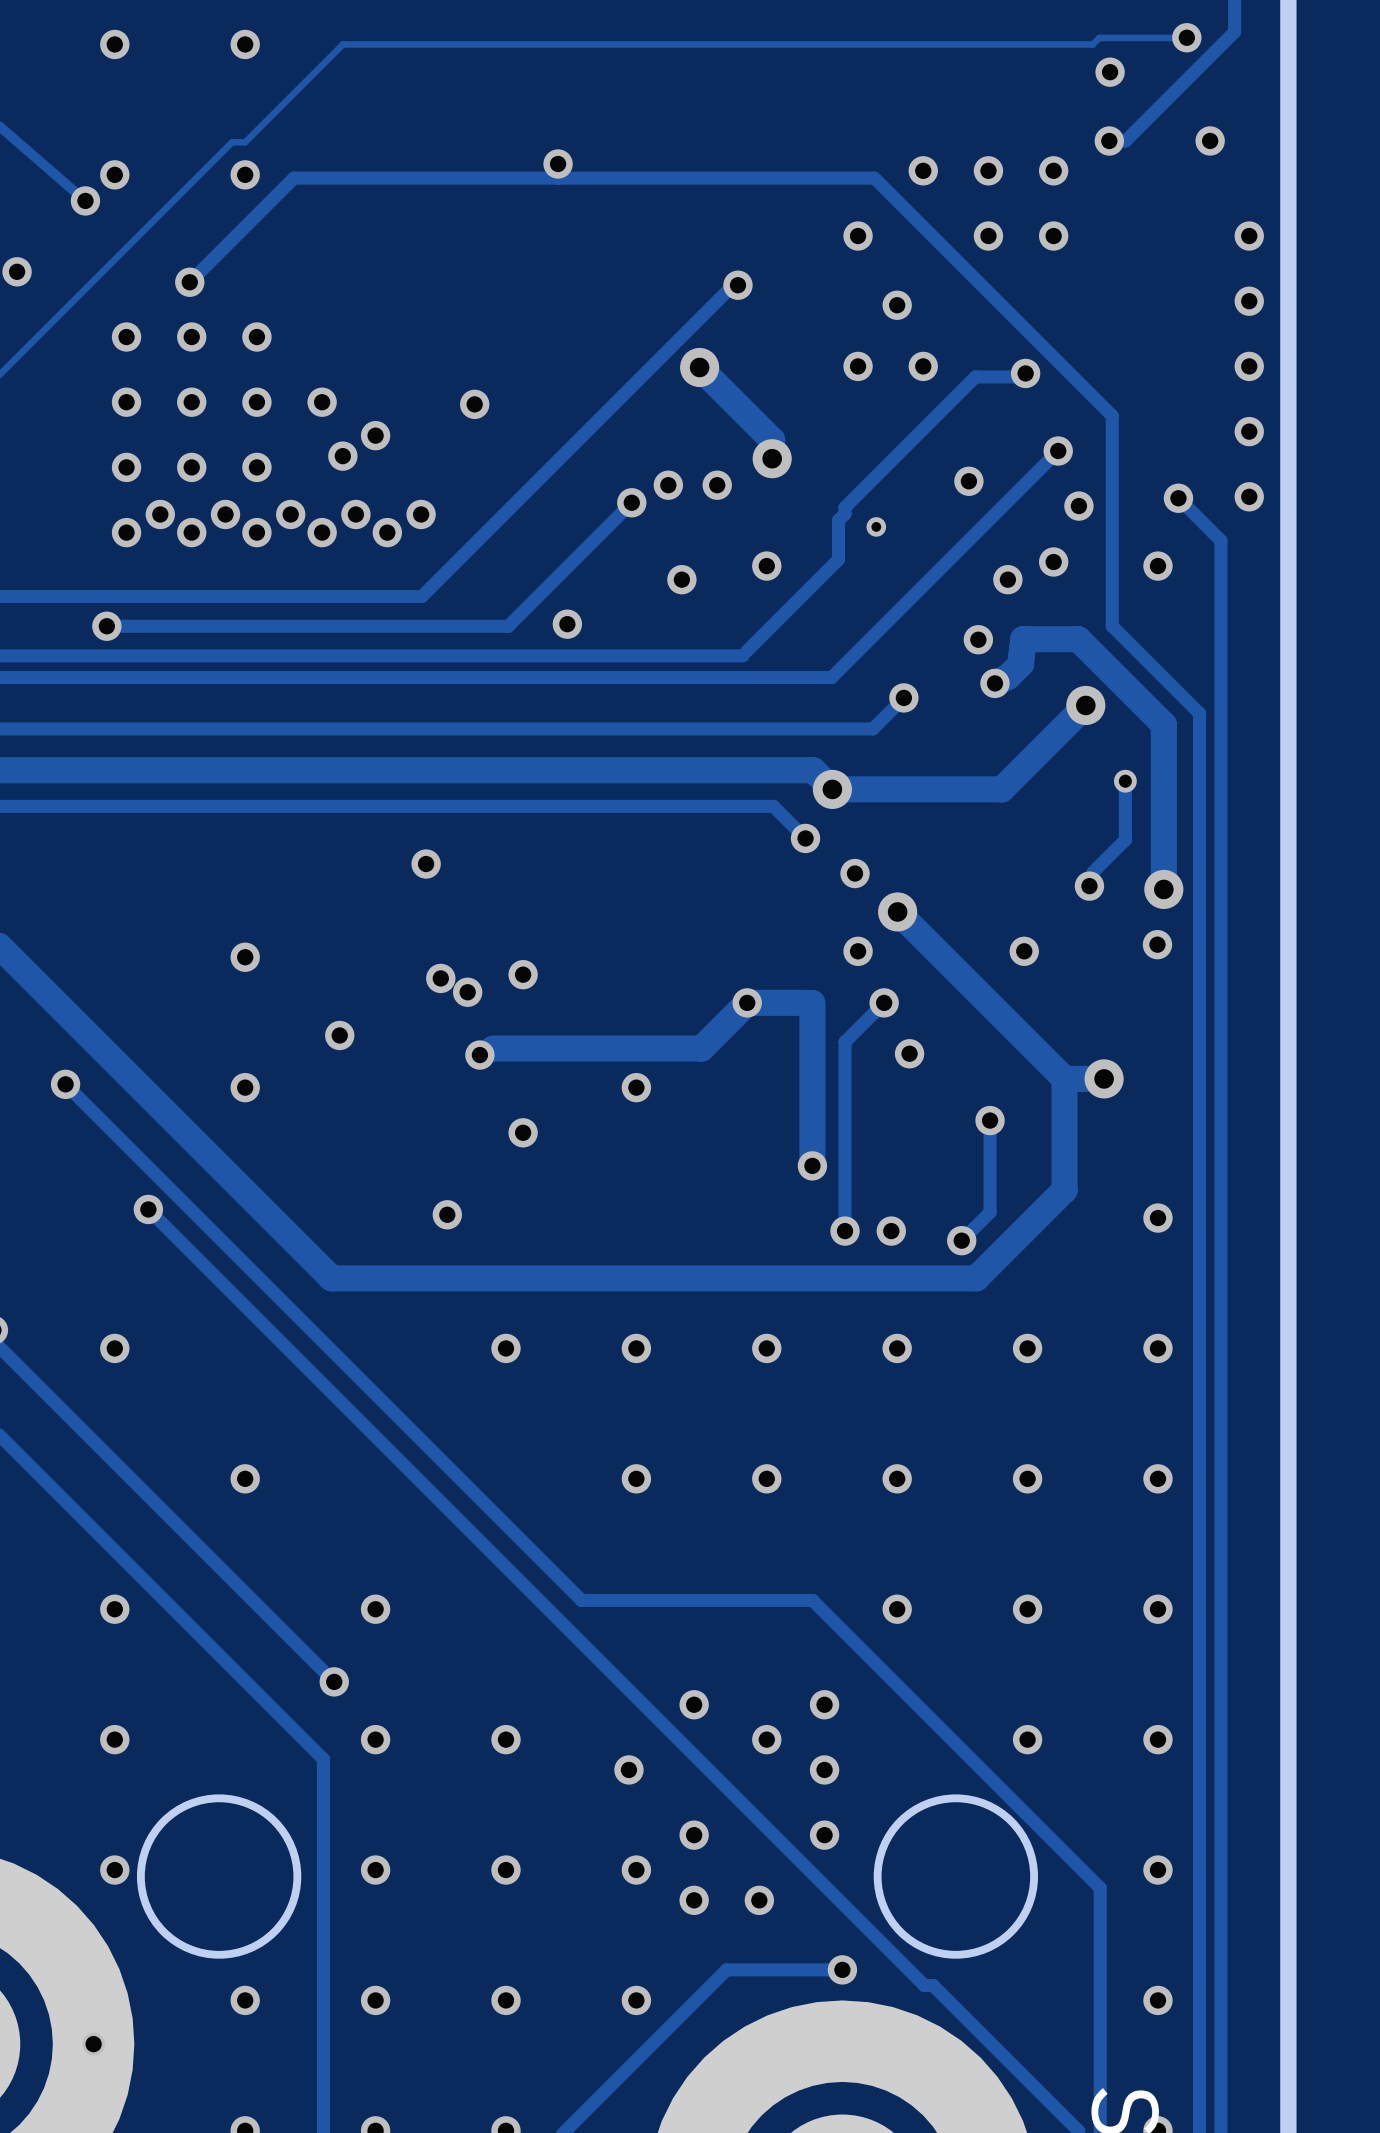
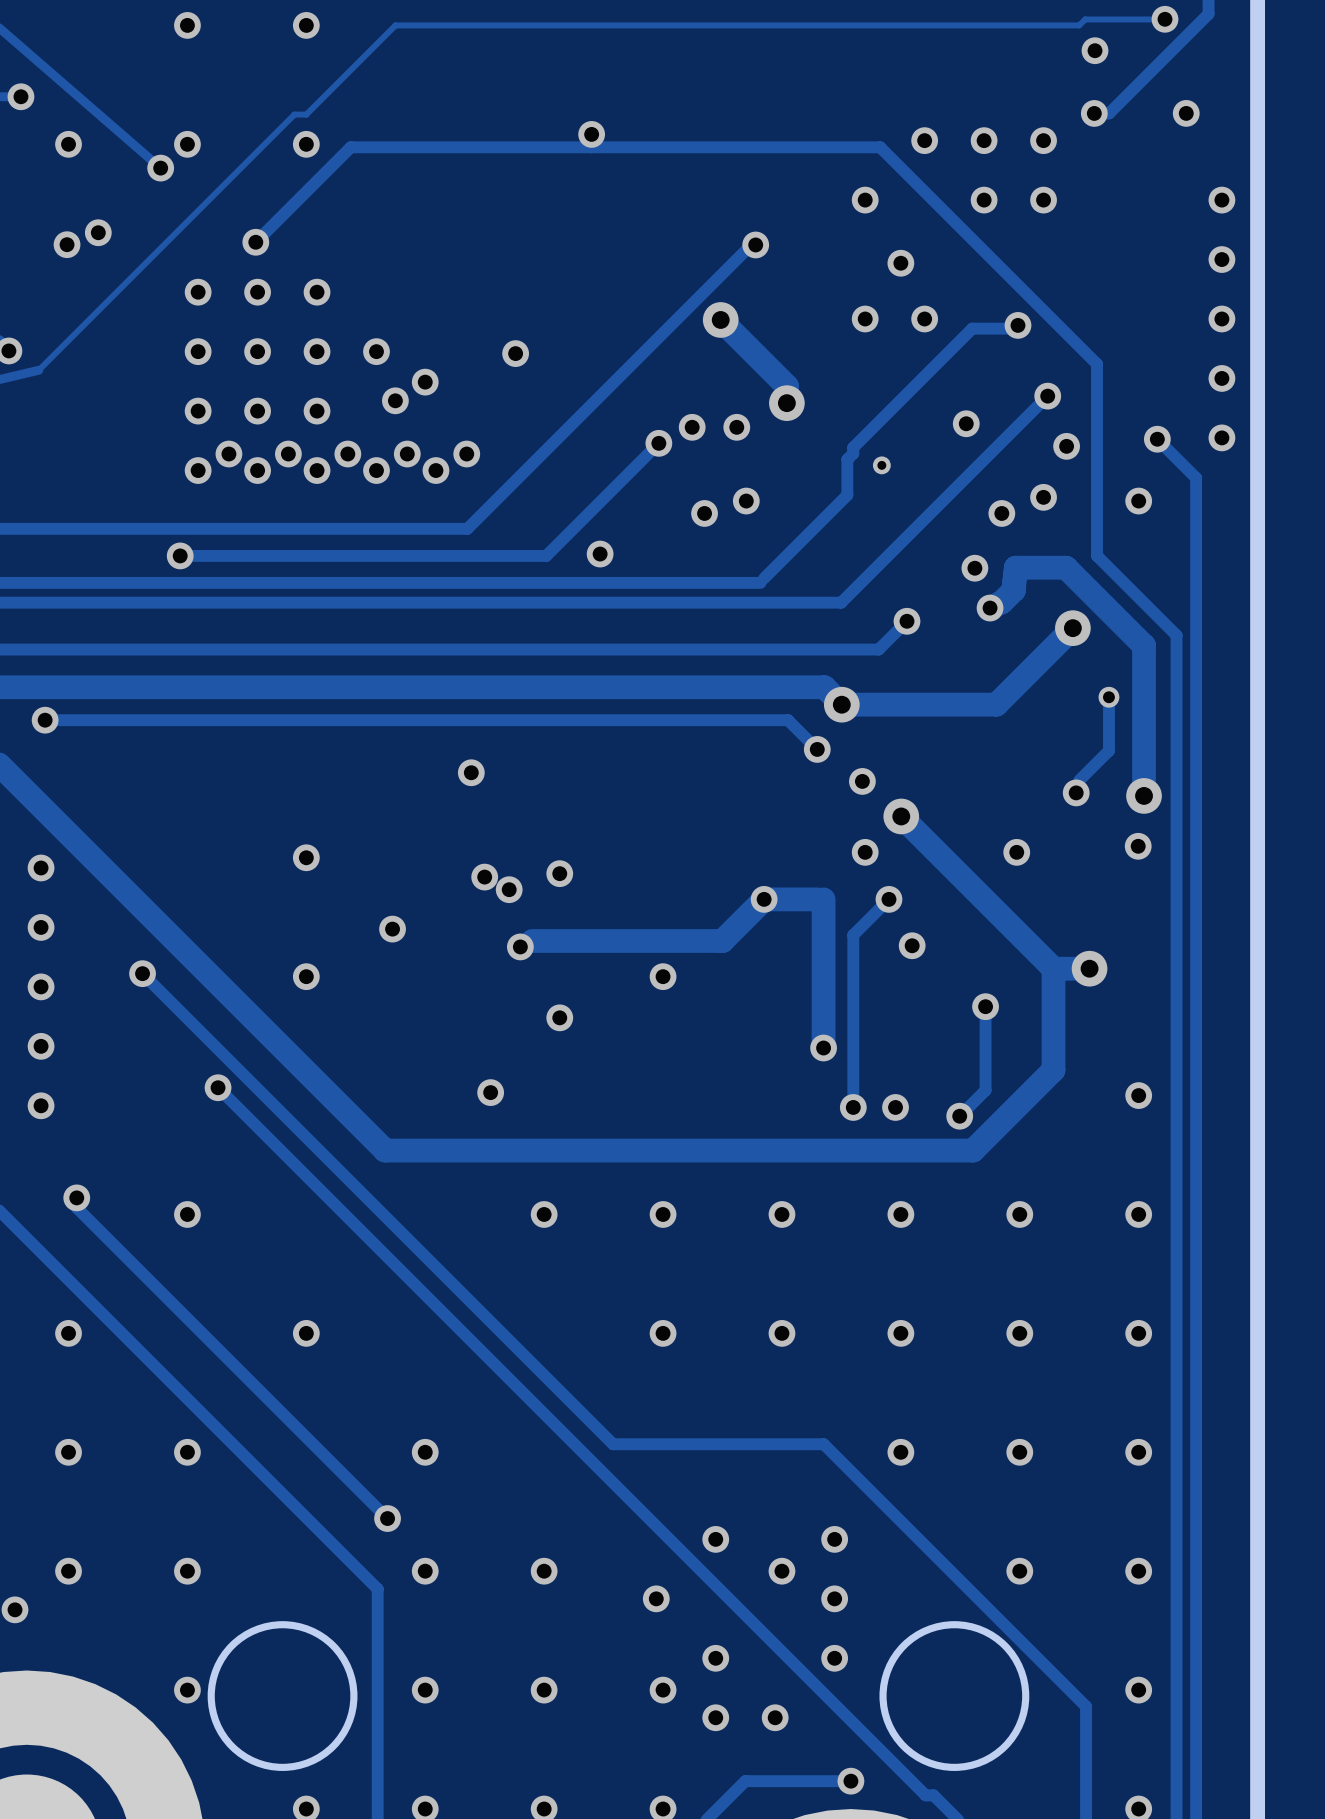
via position: (766, 566) -> (746, 501)

